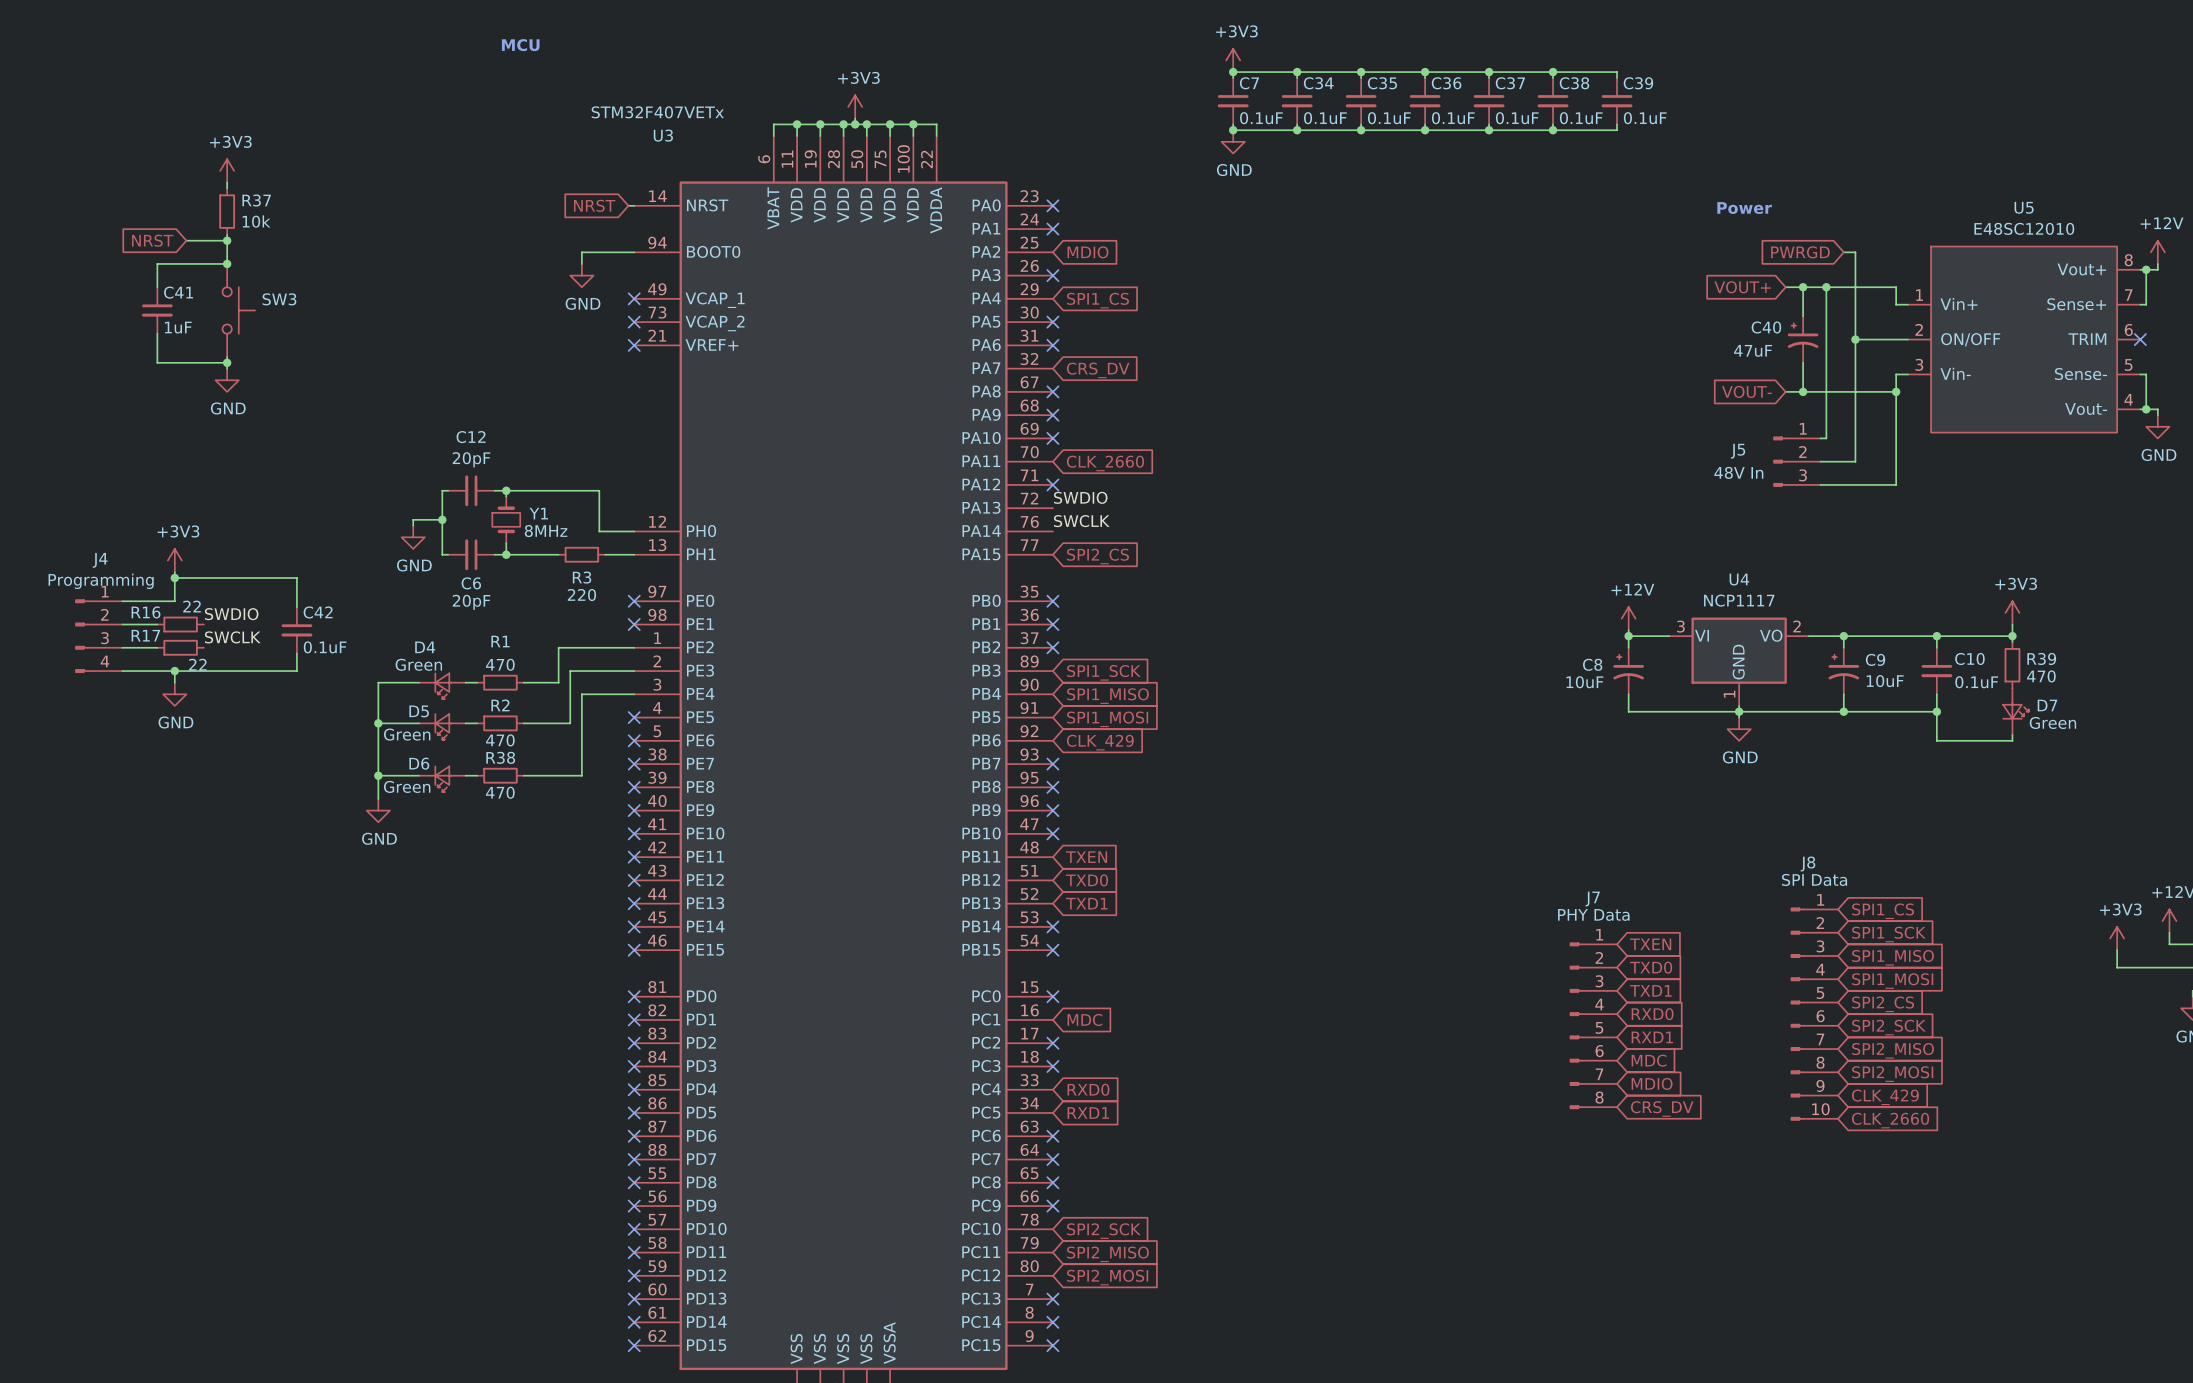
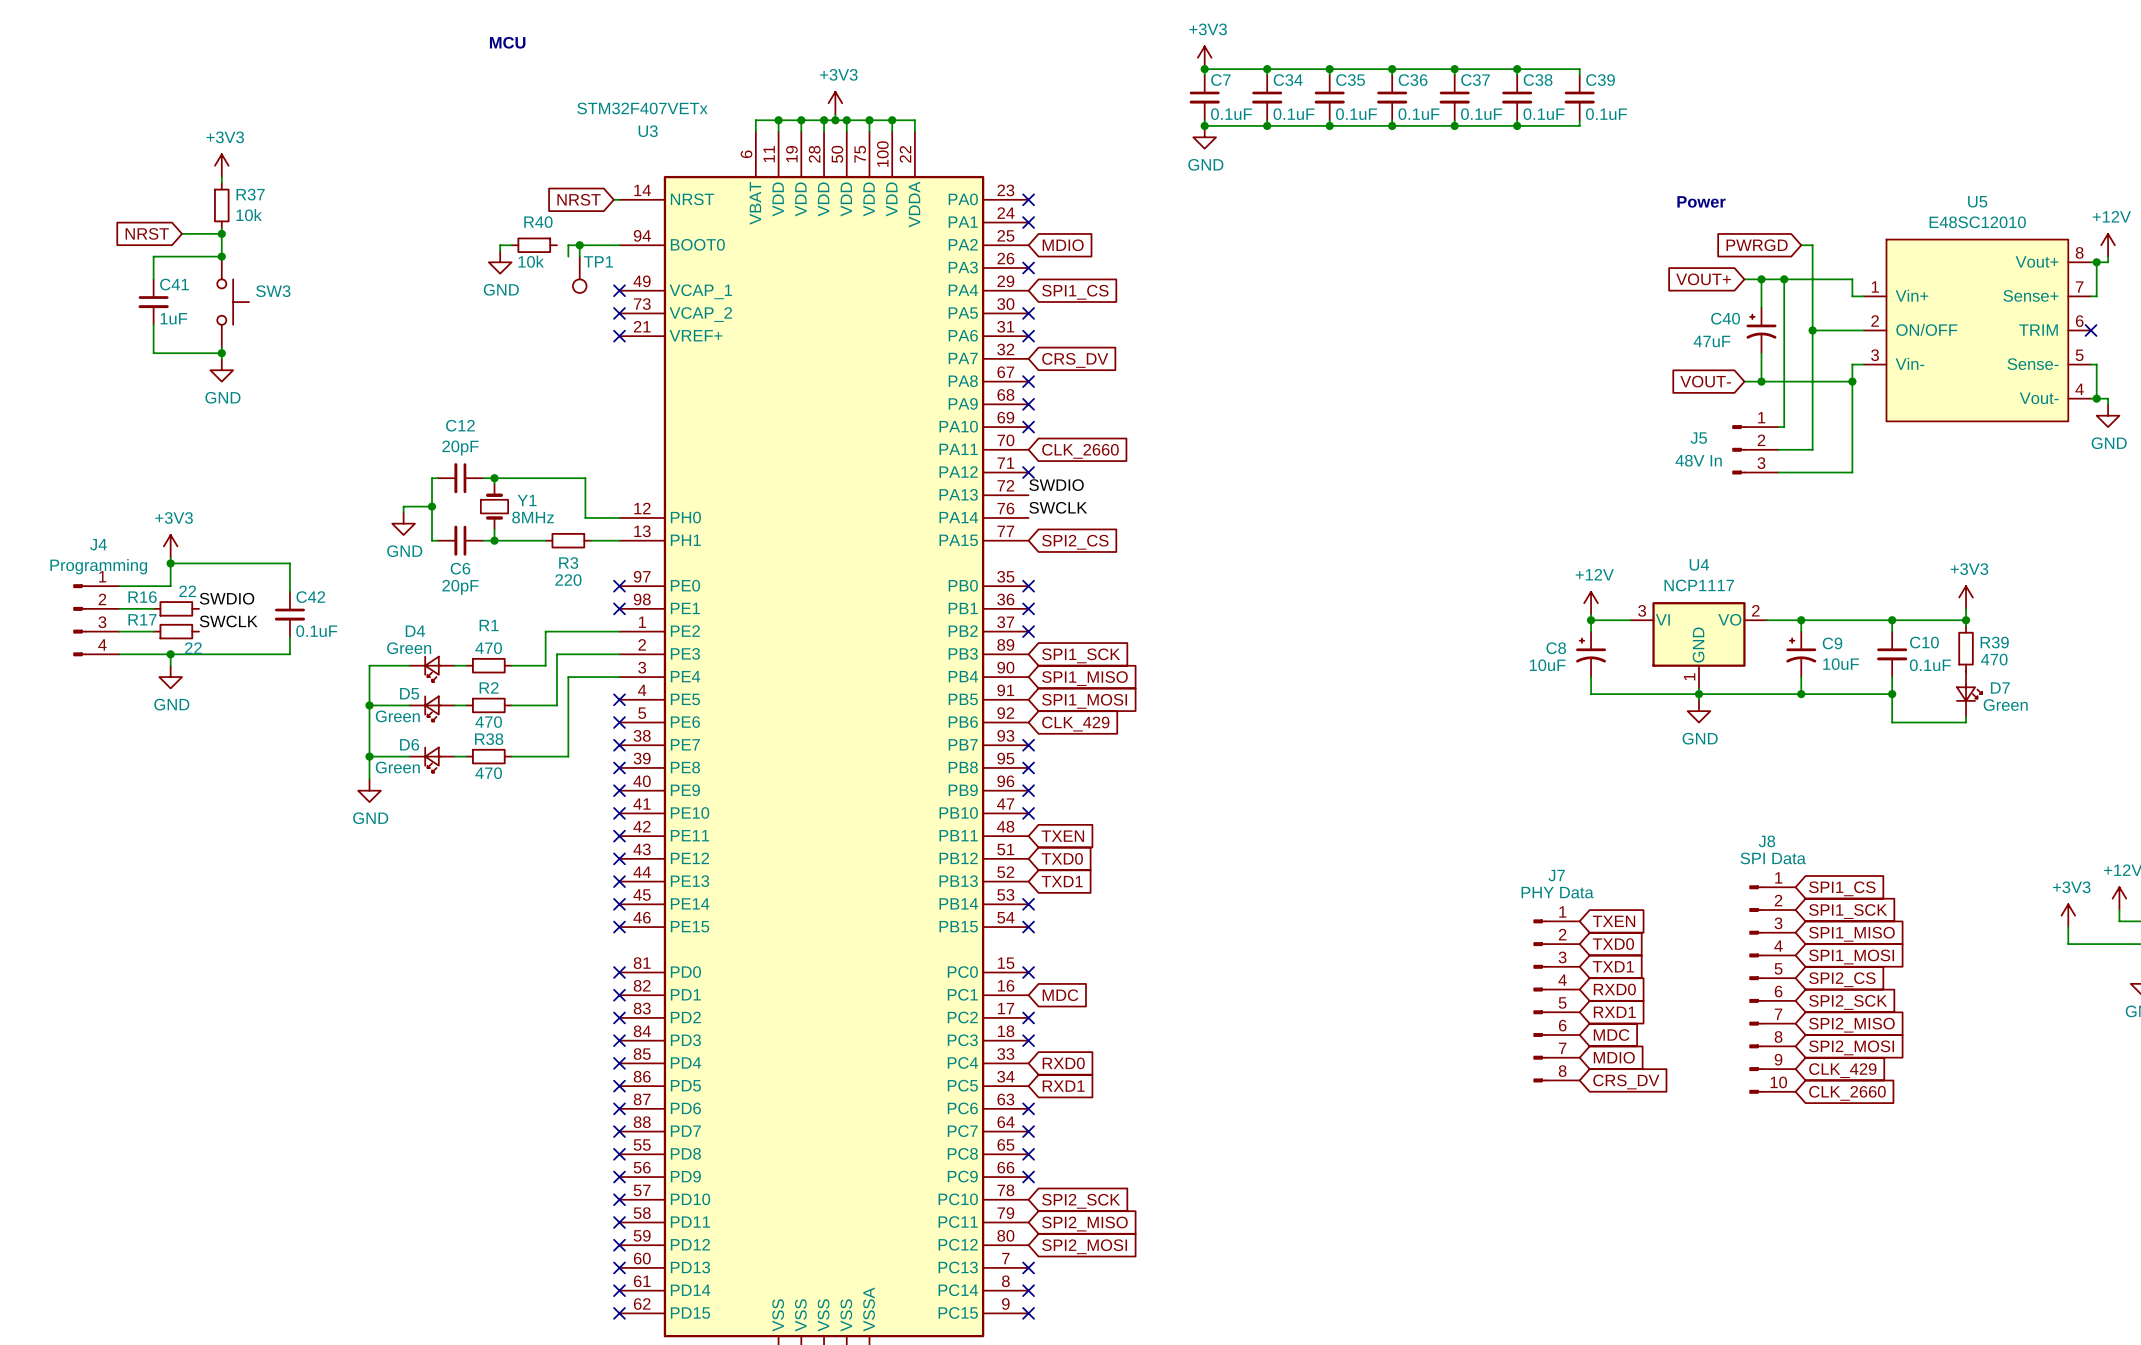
wire: none -> (511, 245) (500, 245) (500, 250)
R40: none -> 10k (534, 245)
wire: none -> (579, 245) (579, 256)
junction: none -> (579, 245)
power symbol position: GND (581, 275) -> GND (500, 262)
TP1: none -> (579, 274)

